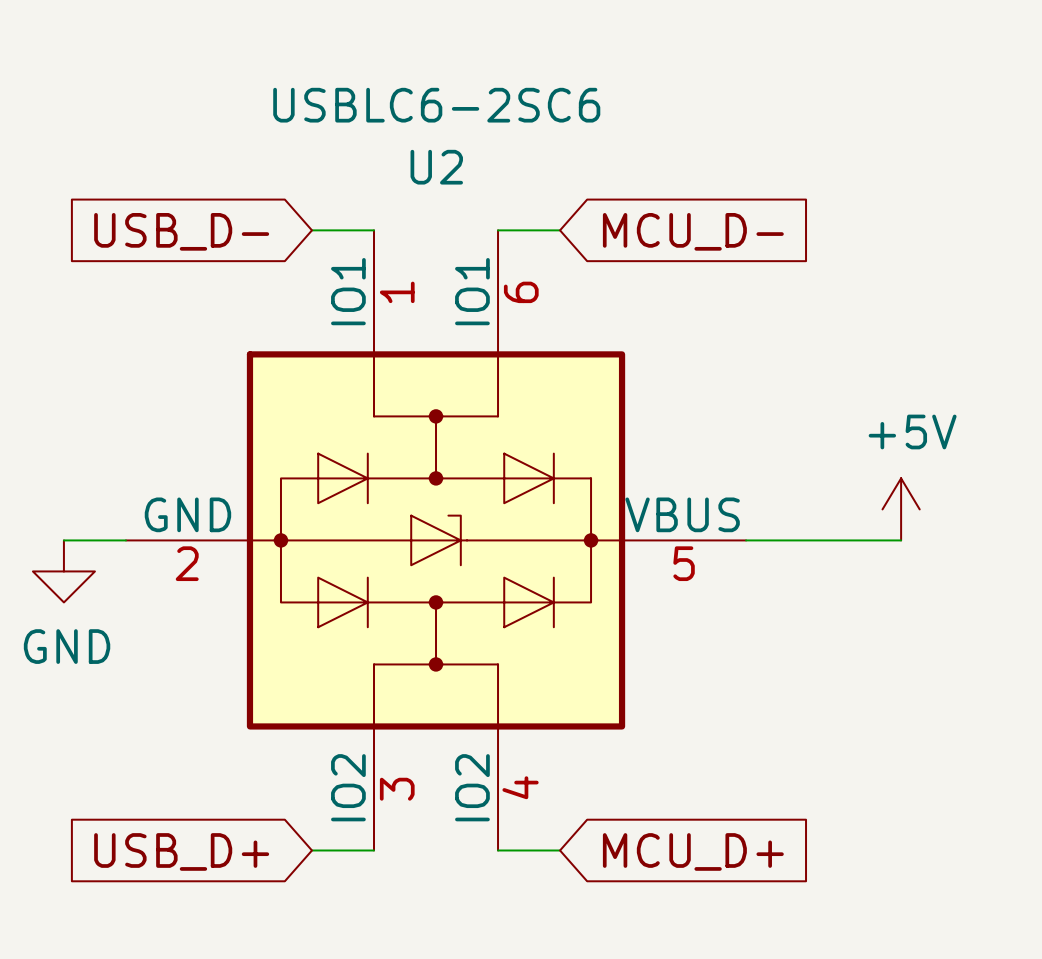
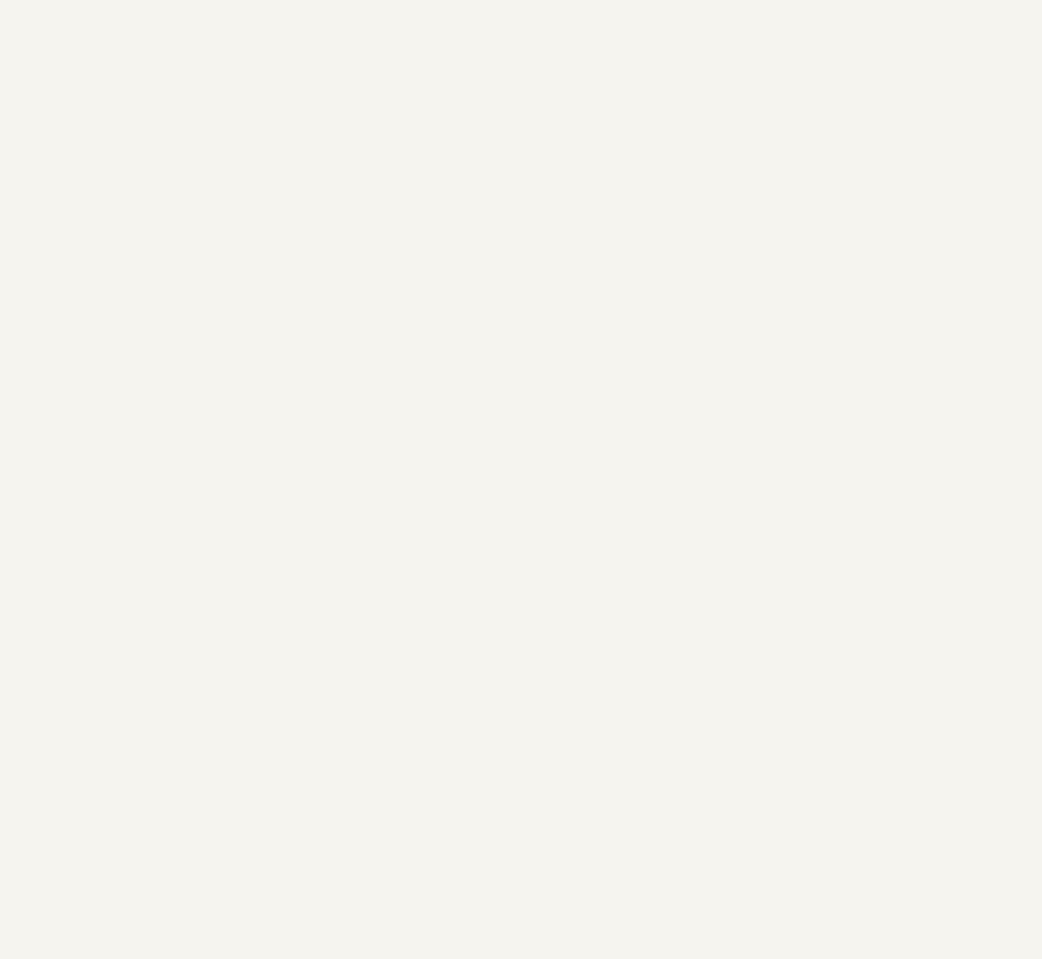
wire: (311, 230) (374, 230) -> none
wire: (498, 230) (560, 230) -> none
global label: USB_D- (181, 231) -> none
global label: MCU_D- (693, 231) -> none
power symbol: +5V (901, 509) -> none
wire: (63, 540) (125, 540) -> none
U2: USBLC6-2SC6 (436, 540) -> none
wire: (746, 540) (901, 540) -> none
power symbol: GND (63, 571) -> none
wire: (311, 850) (374, 850) -> none
wire: (498, 850) (560, 850) -> none
global label: USB_D+ (181, 851) -> none
global label: MCU_D+ (693, 851) -> none

